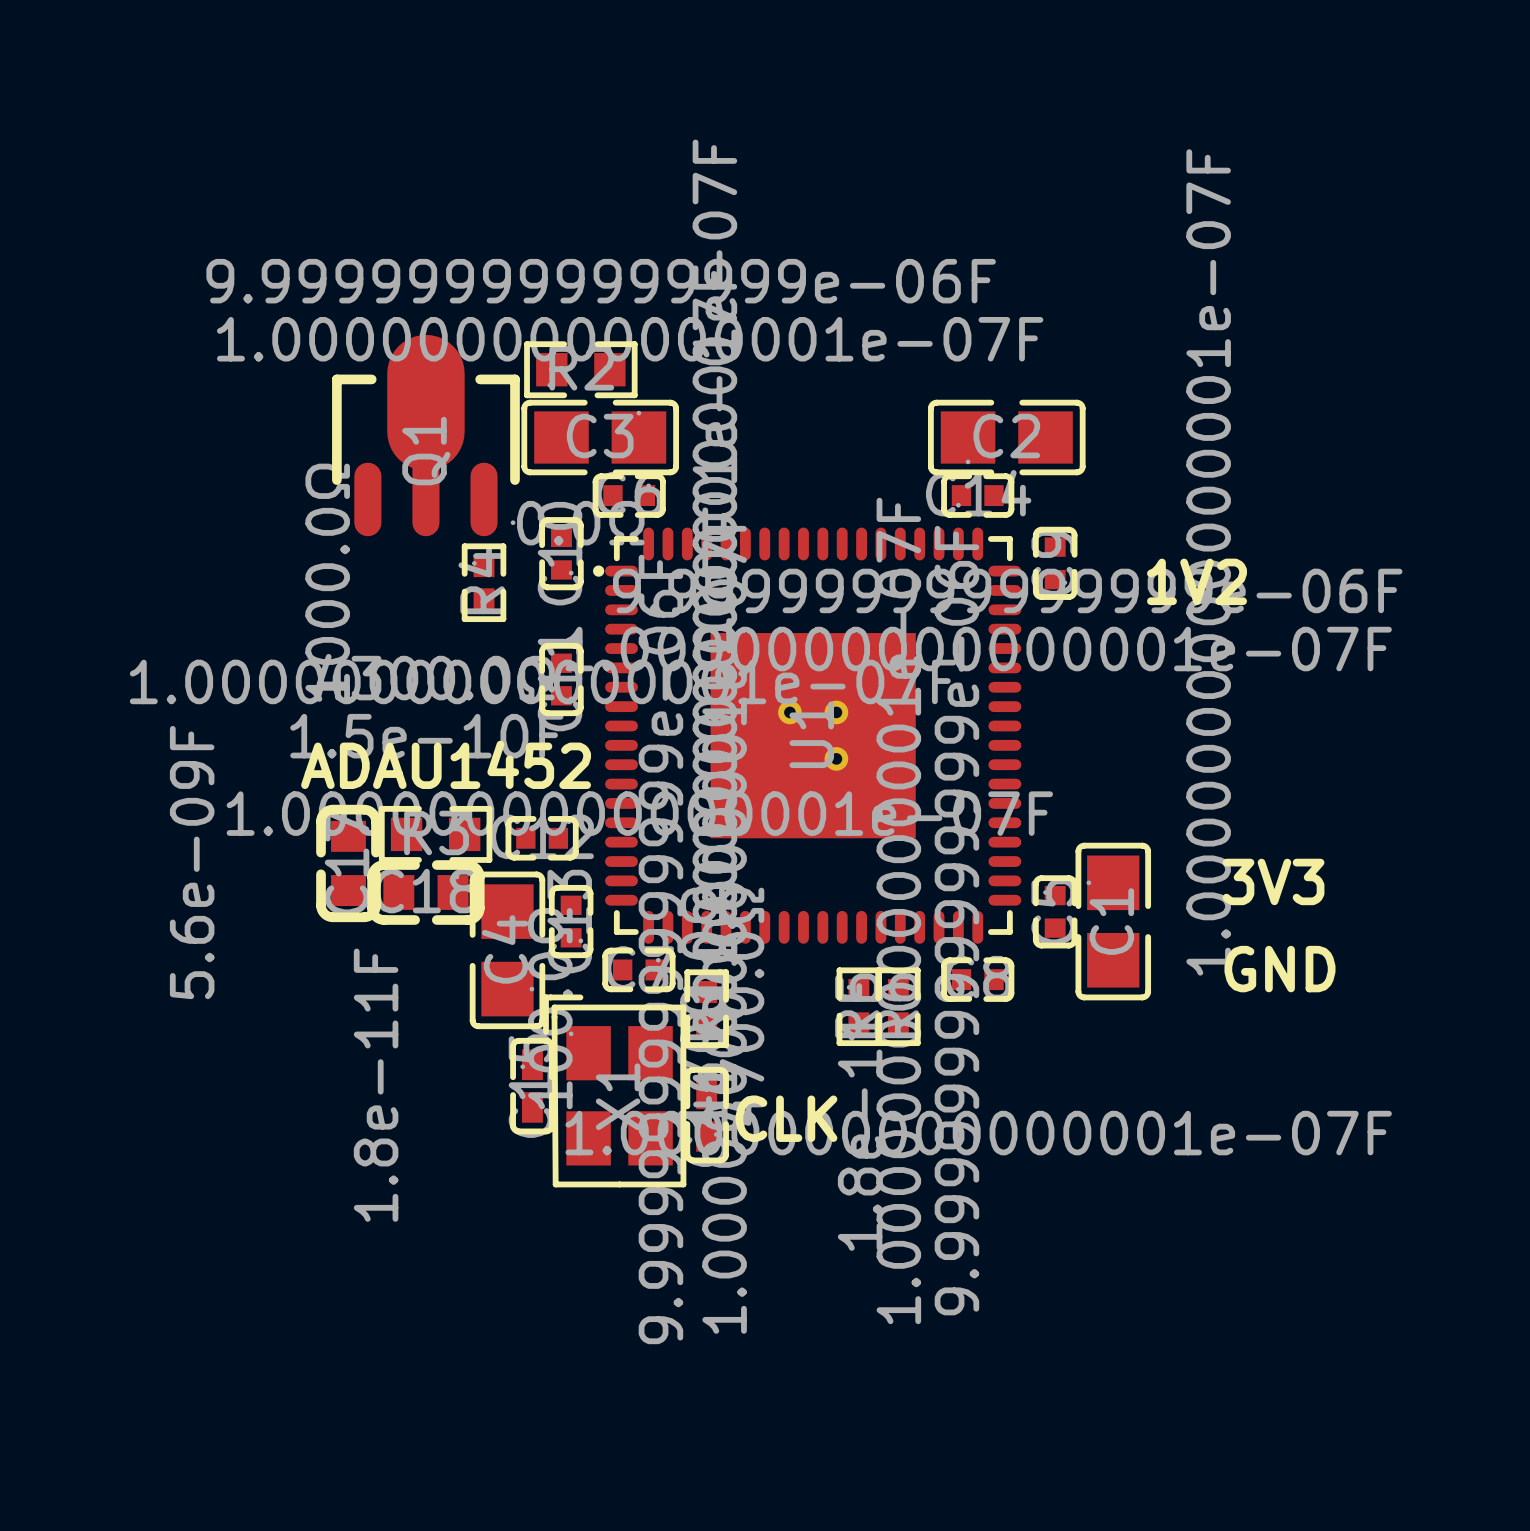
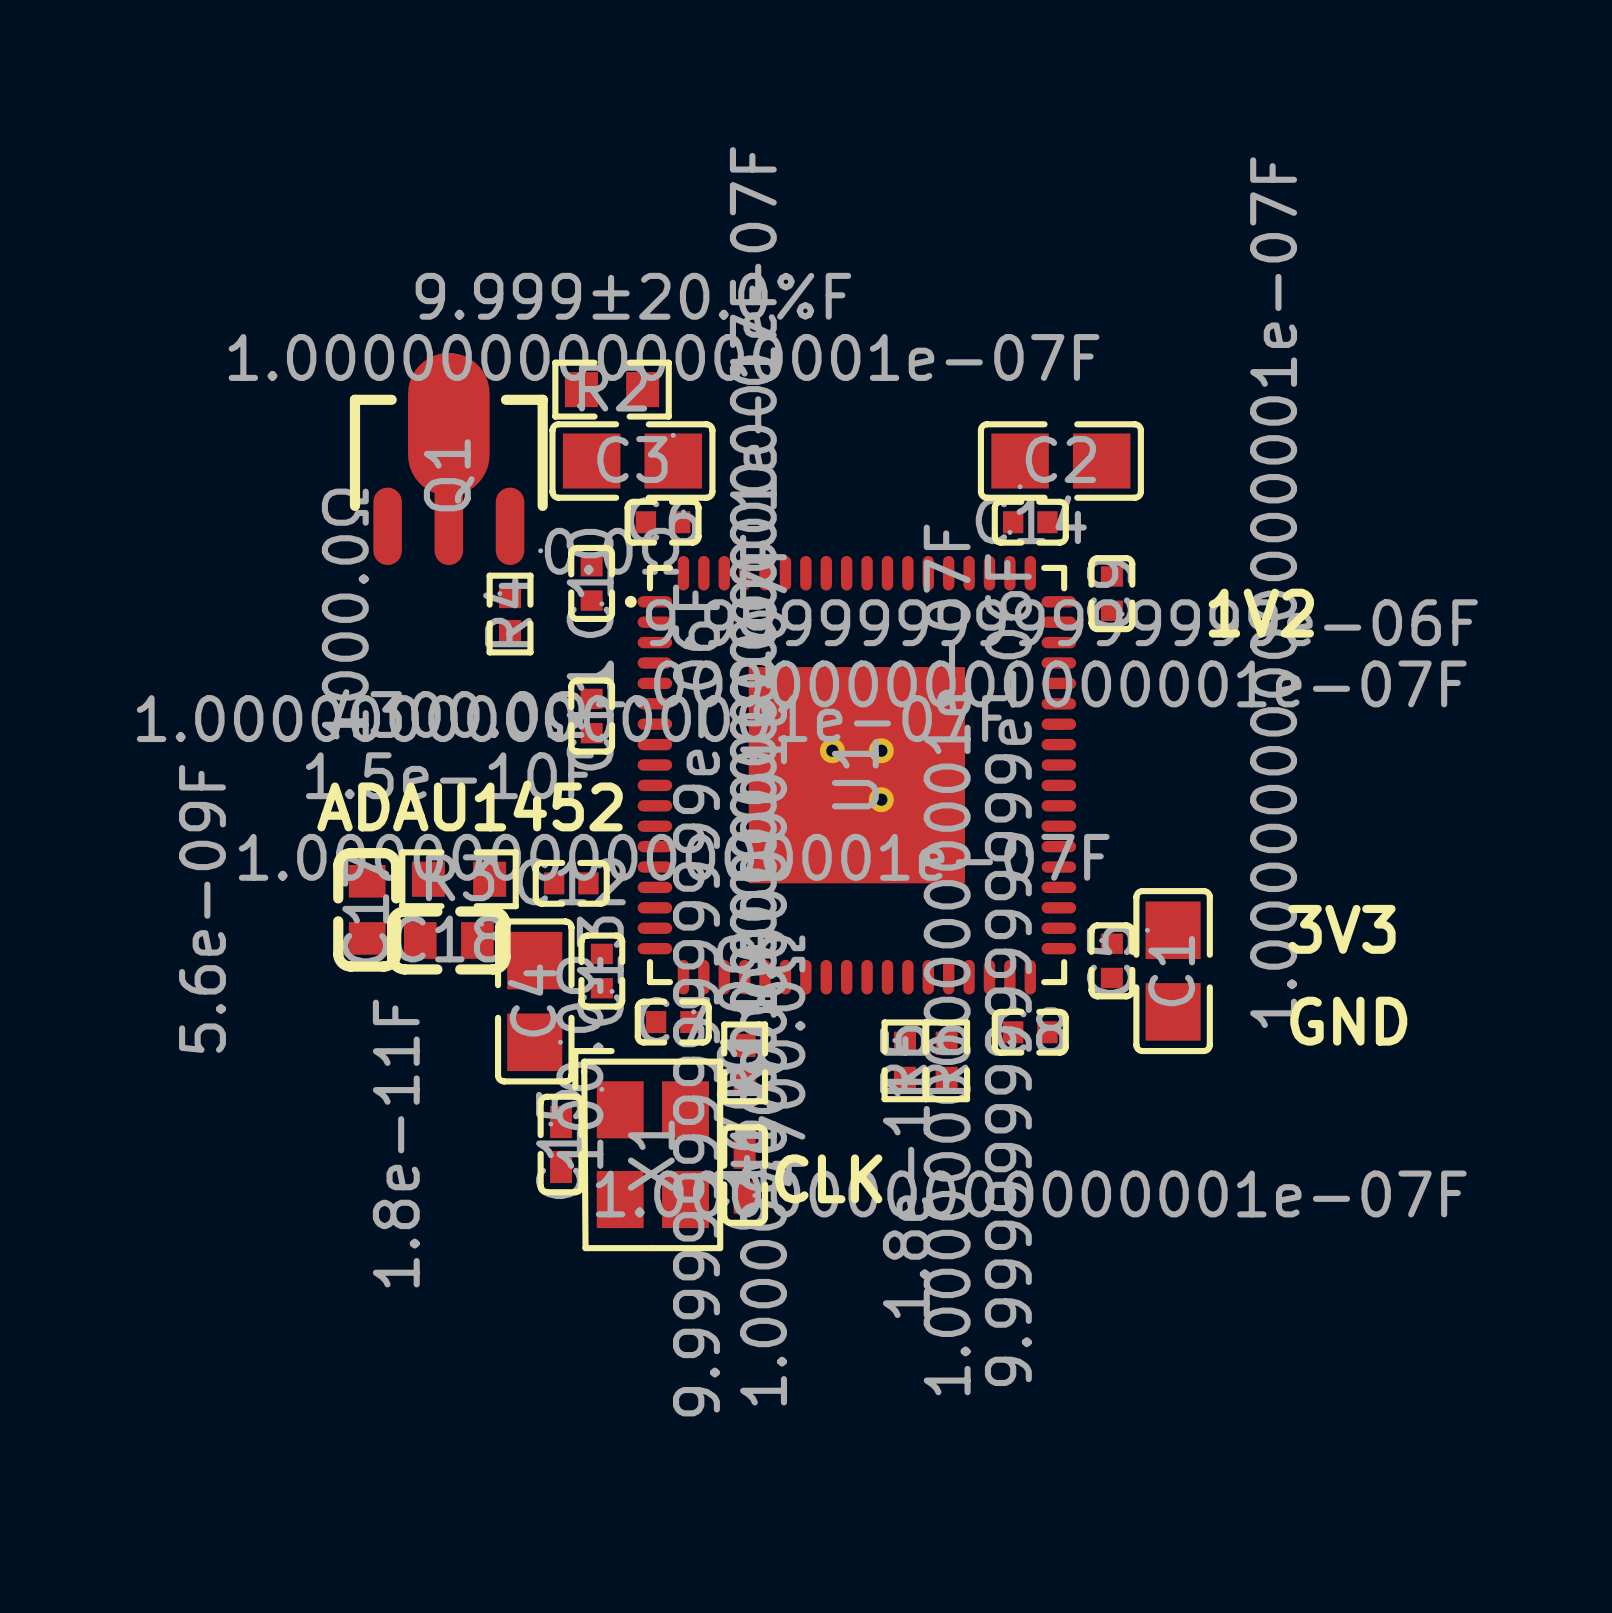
C3 value: 9.999999999999999e-06F (601, 281) -> 9.999±20.0%F (633, 296)

